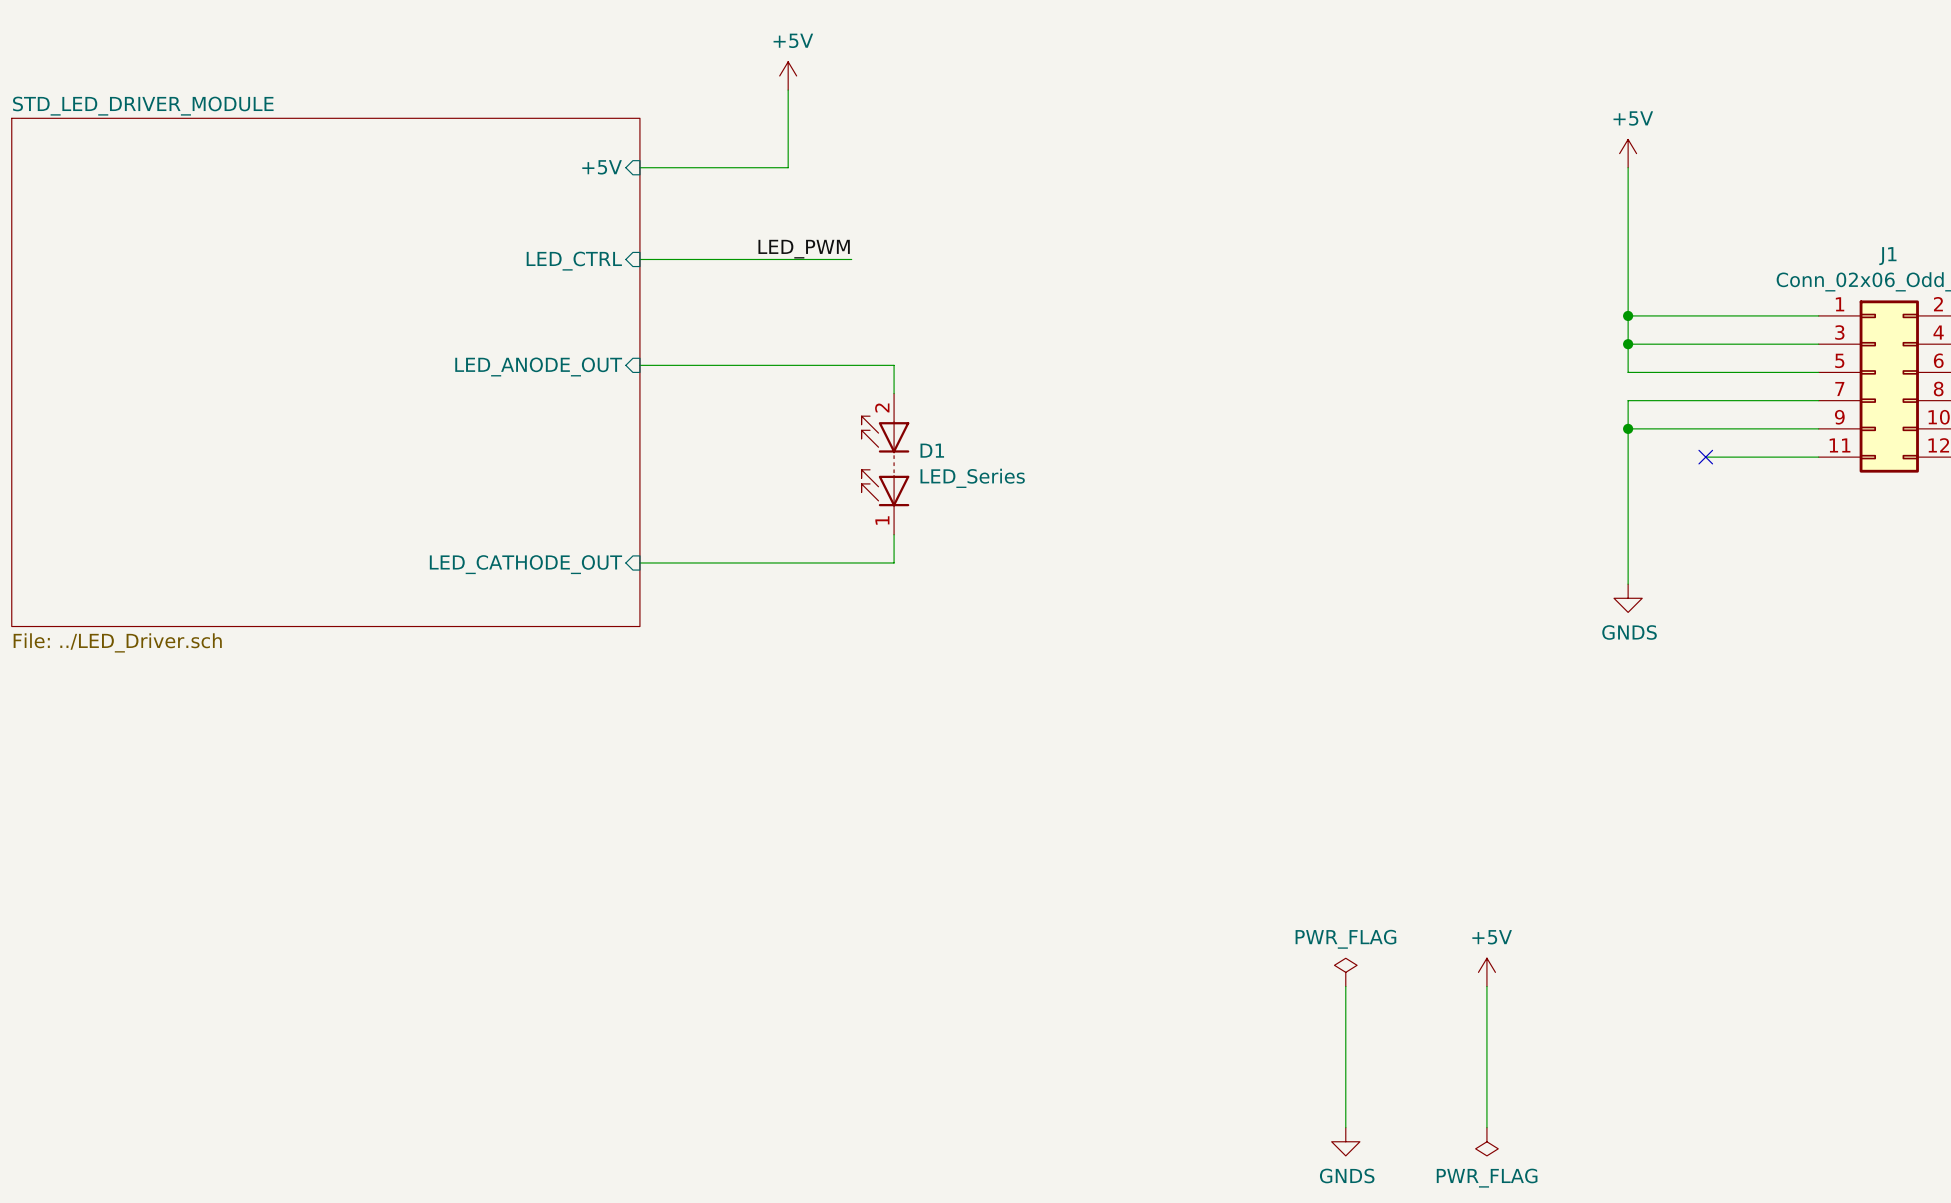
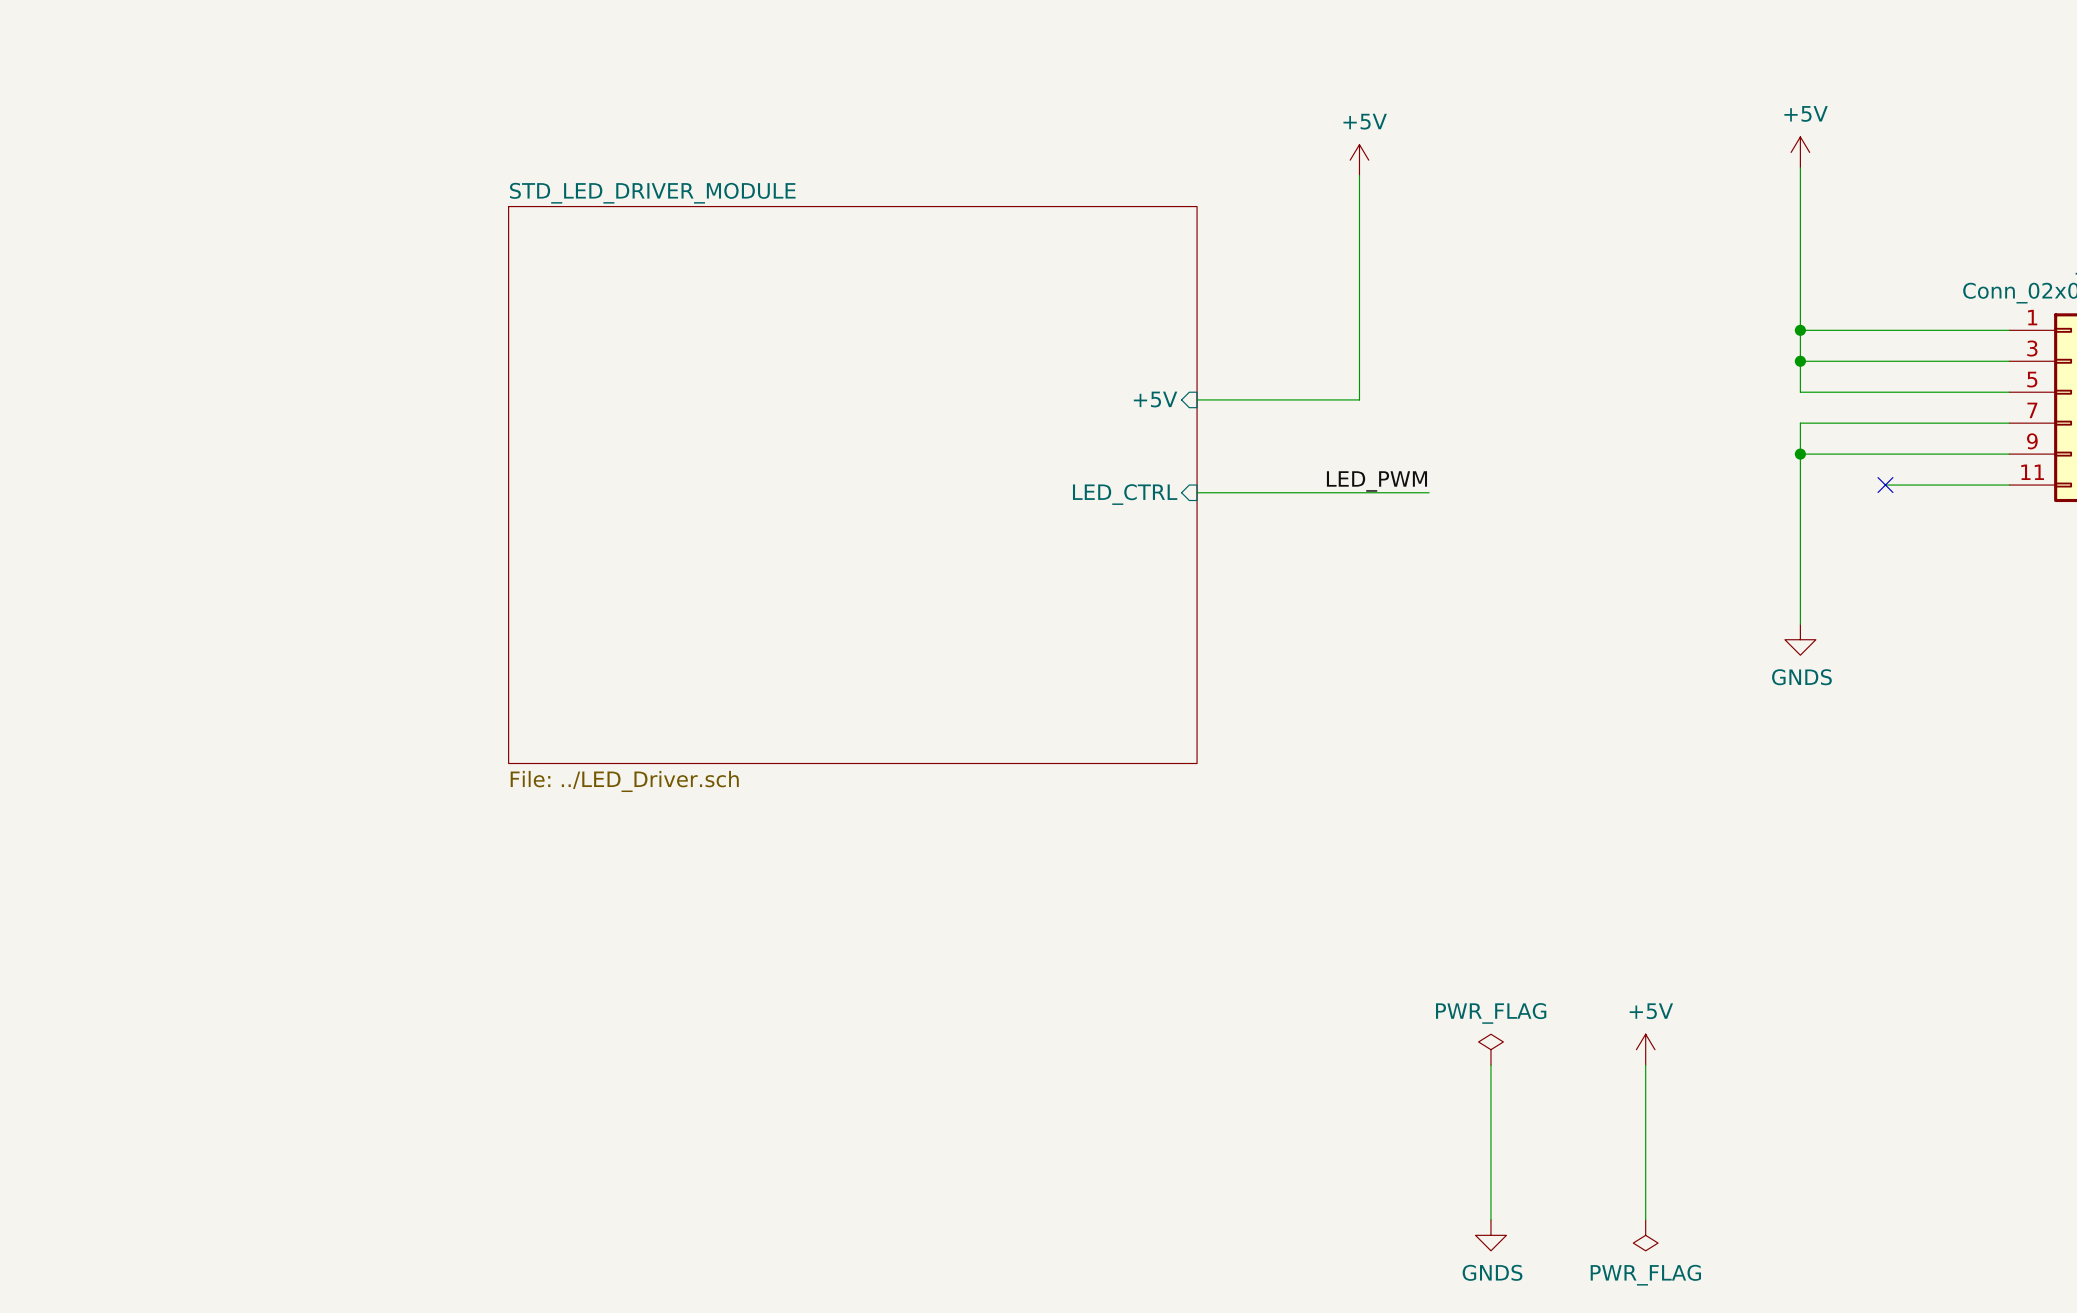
power symbol: +5V (788, 75) -> none
wire: (788, 90) (788, 167) (639, 167) -> none
power symbol: none -> +5V (1359, 160)
sheet pin: +5V (602, 167) -> none
wire: none -> (1359, 175) (1359, 399) (1197, 399)
label: LED_PWM (804, 249) -> none
wire: (639, 259) (851, 259) -> none
sheet pin: LED_CTRL (574, 261) -> none
wire: (639, 365) (894, 365) (894, 393) -> none
sheet pin: LED_ANODE_OUT (538, 366) -> none
sheet STD_LED_DRIVER_MODULE: File: ../LED_Driver.sch (325, 372) -> none
sheet pin: none -> +5V (1155, 399)
label: none -> LED_PWM (1376, 481)
sheet STD_LED_DRIVER_MODULE: none -> File: ../LED_Driver.sch (852, 485)
D1: LED_Series (885, 464) -> none
wire: none -> (1197, 492) (1429, 492)
sheet pin: none -> LED_CTRL (1125, 494)
wire: (894, 534) (894, 562) (639, 562) -> none
sheet pin: LED_CATHODE_OUT (525, 564) -> none

